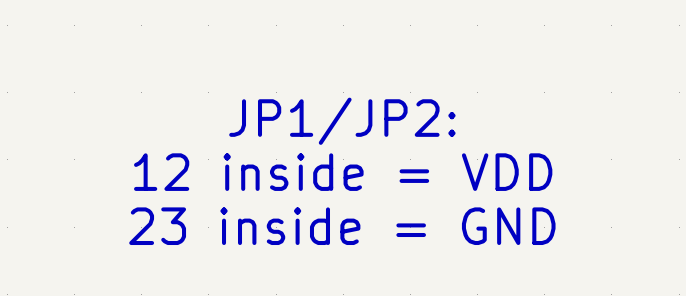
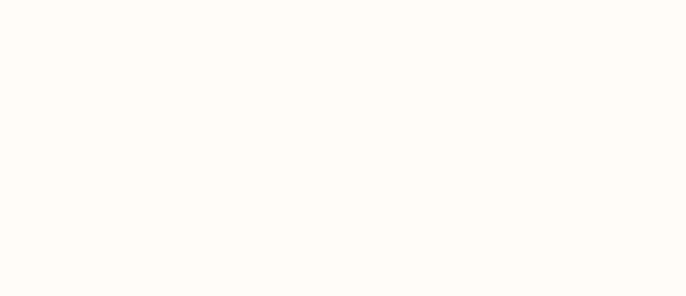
text: JP1/JP2: (342, 121) -> none
text: 12 inside = VDD (343, 172) -> none
text: 23 inside = GND (342, 226) -> none

